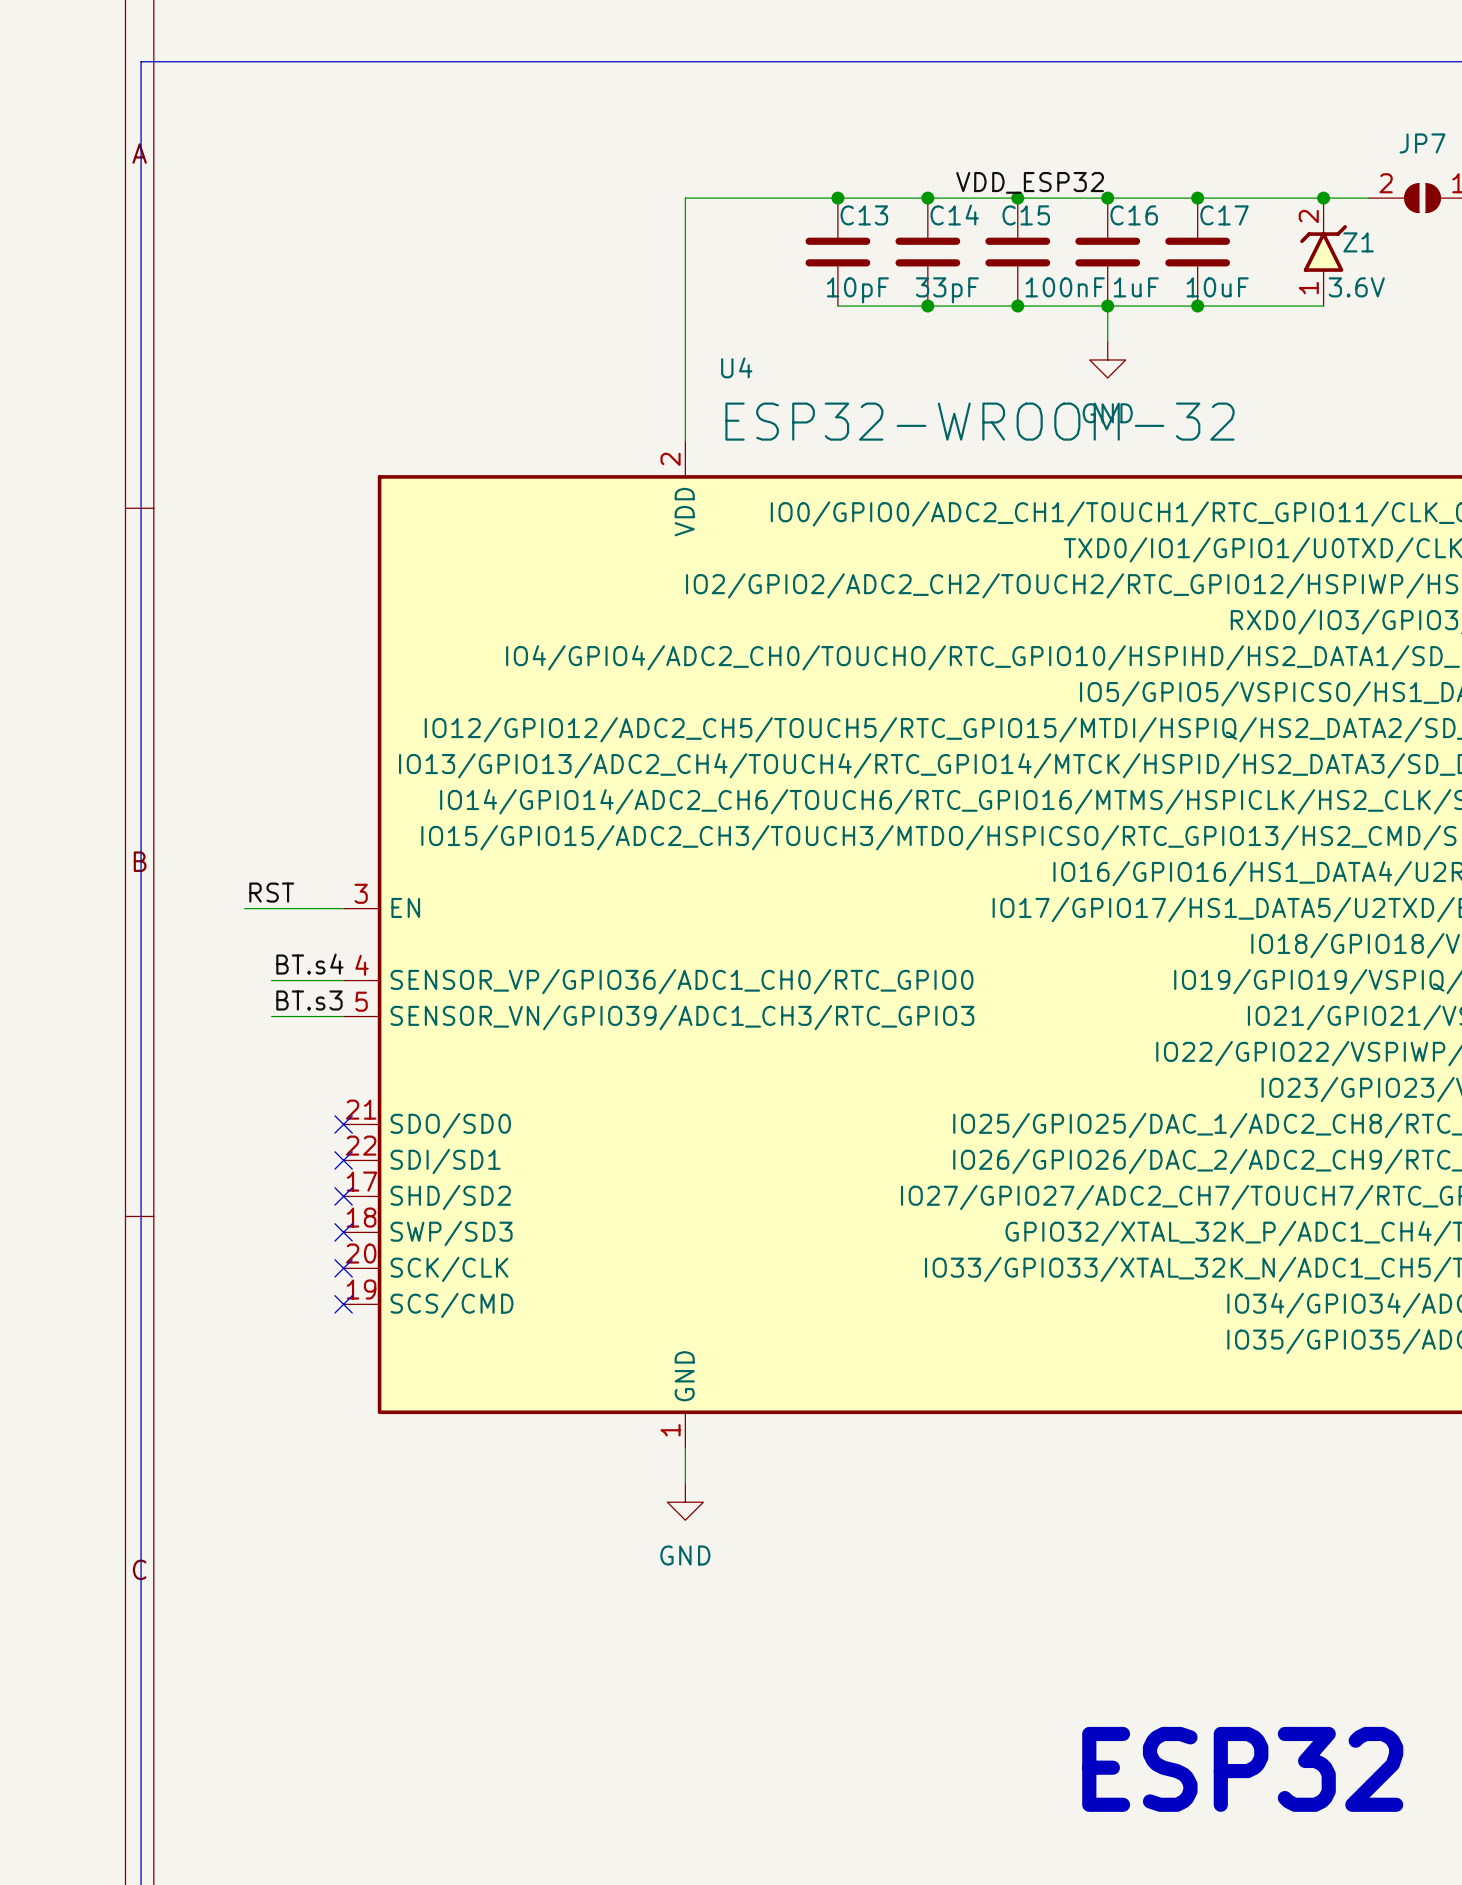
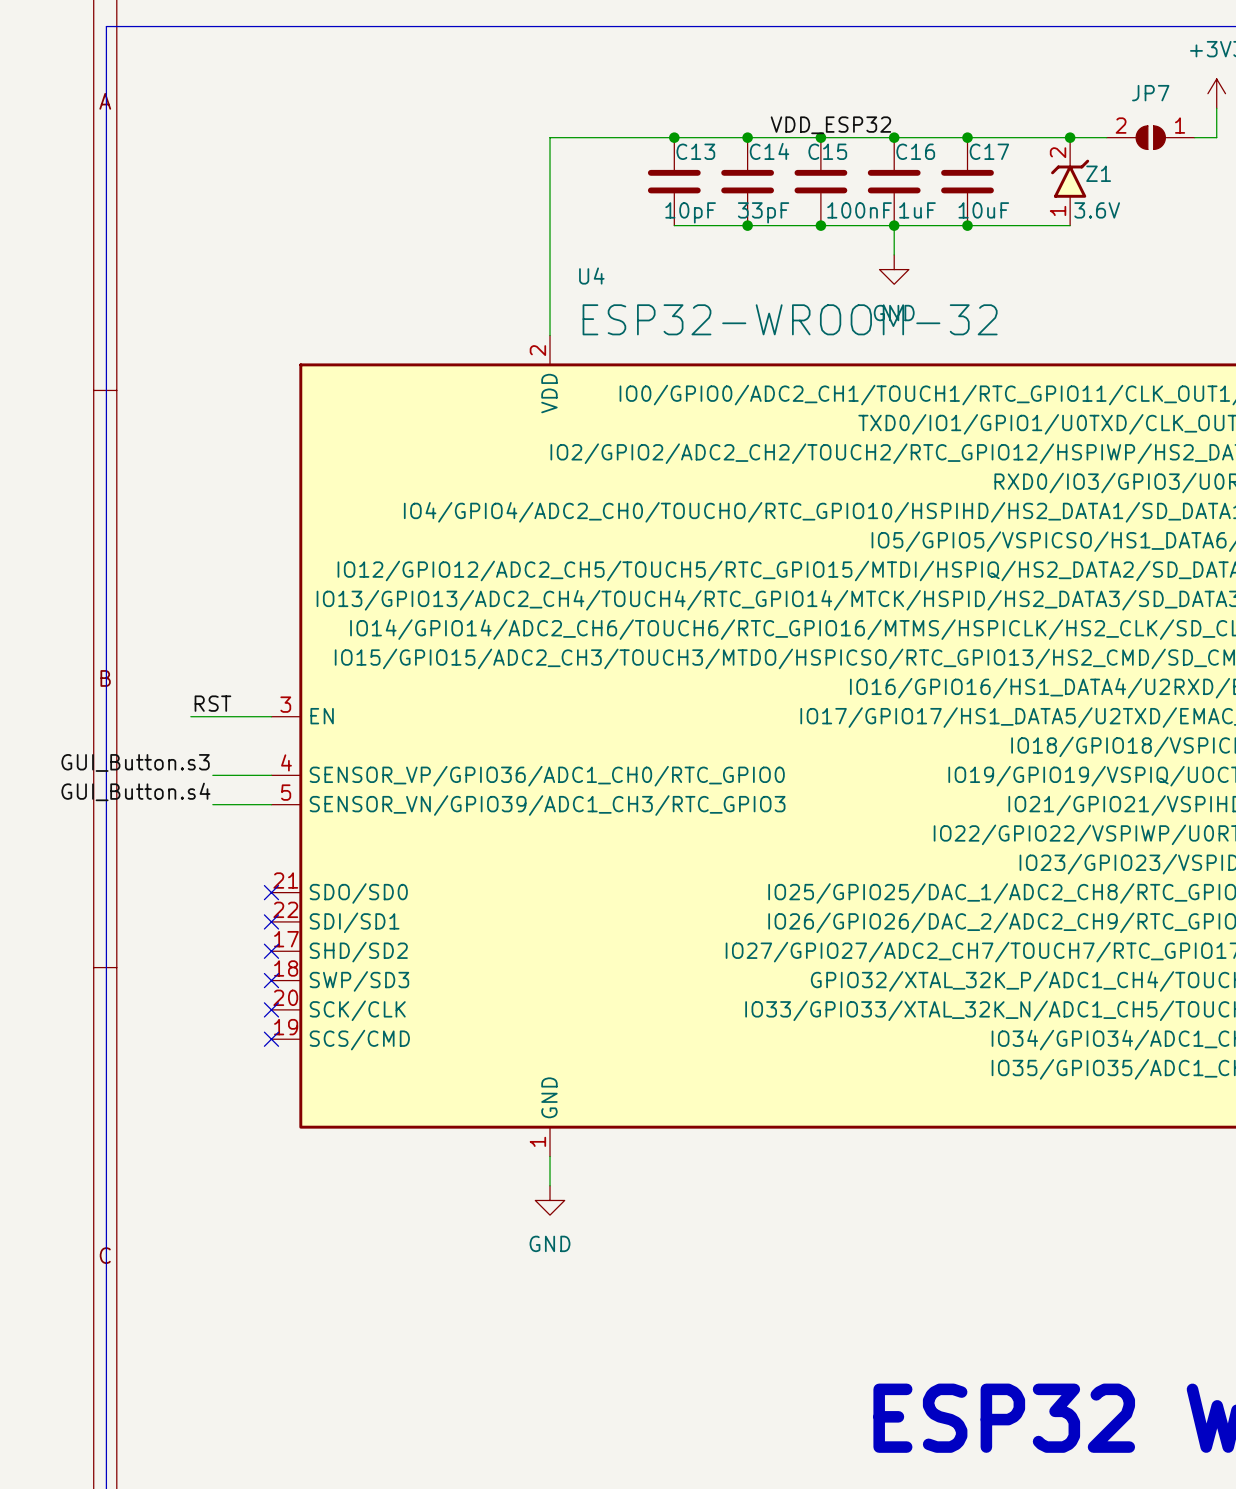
label: BT.s4 (309, 964) -> GUI_Button.s3 (135, 762)
label: BT.s3 (309, 1000) -> GUI_Button.s4 (135, 791)

